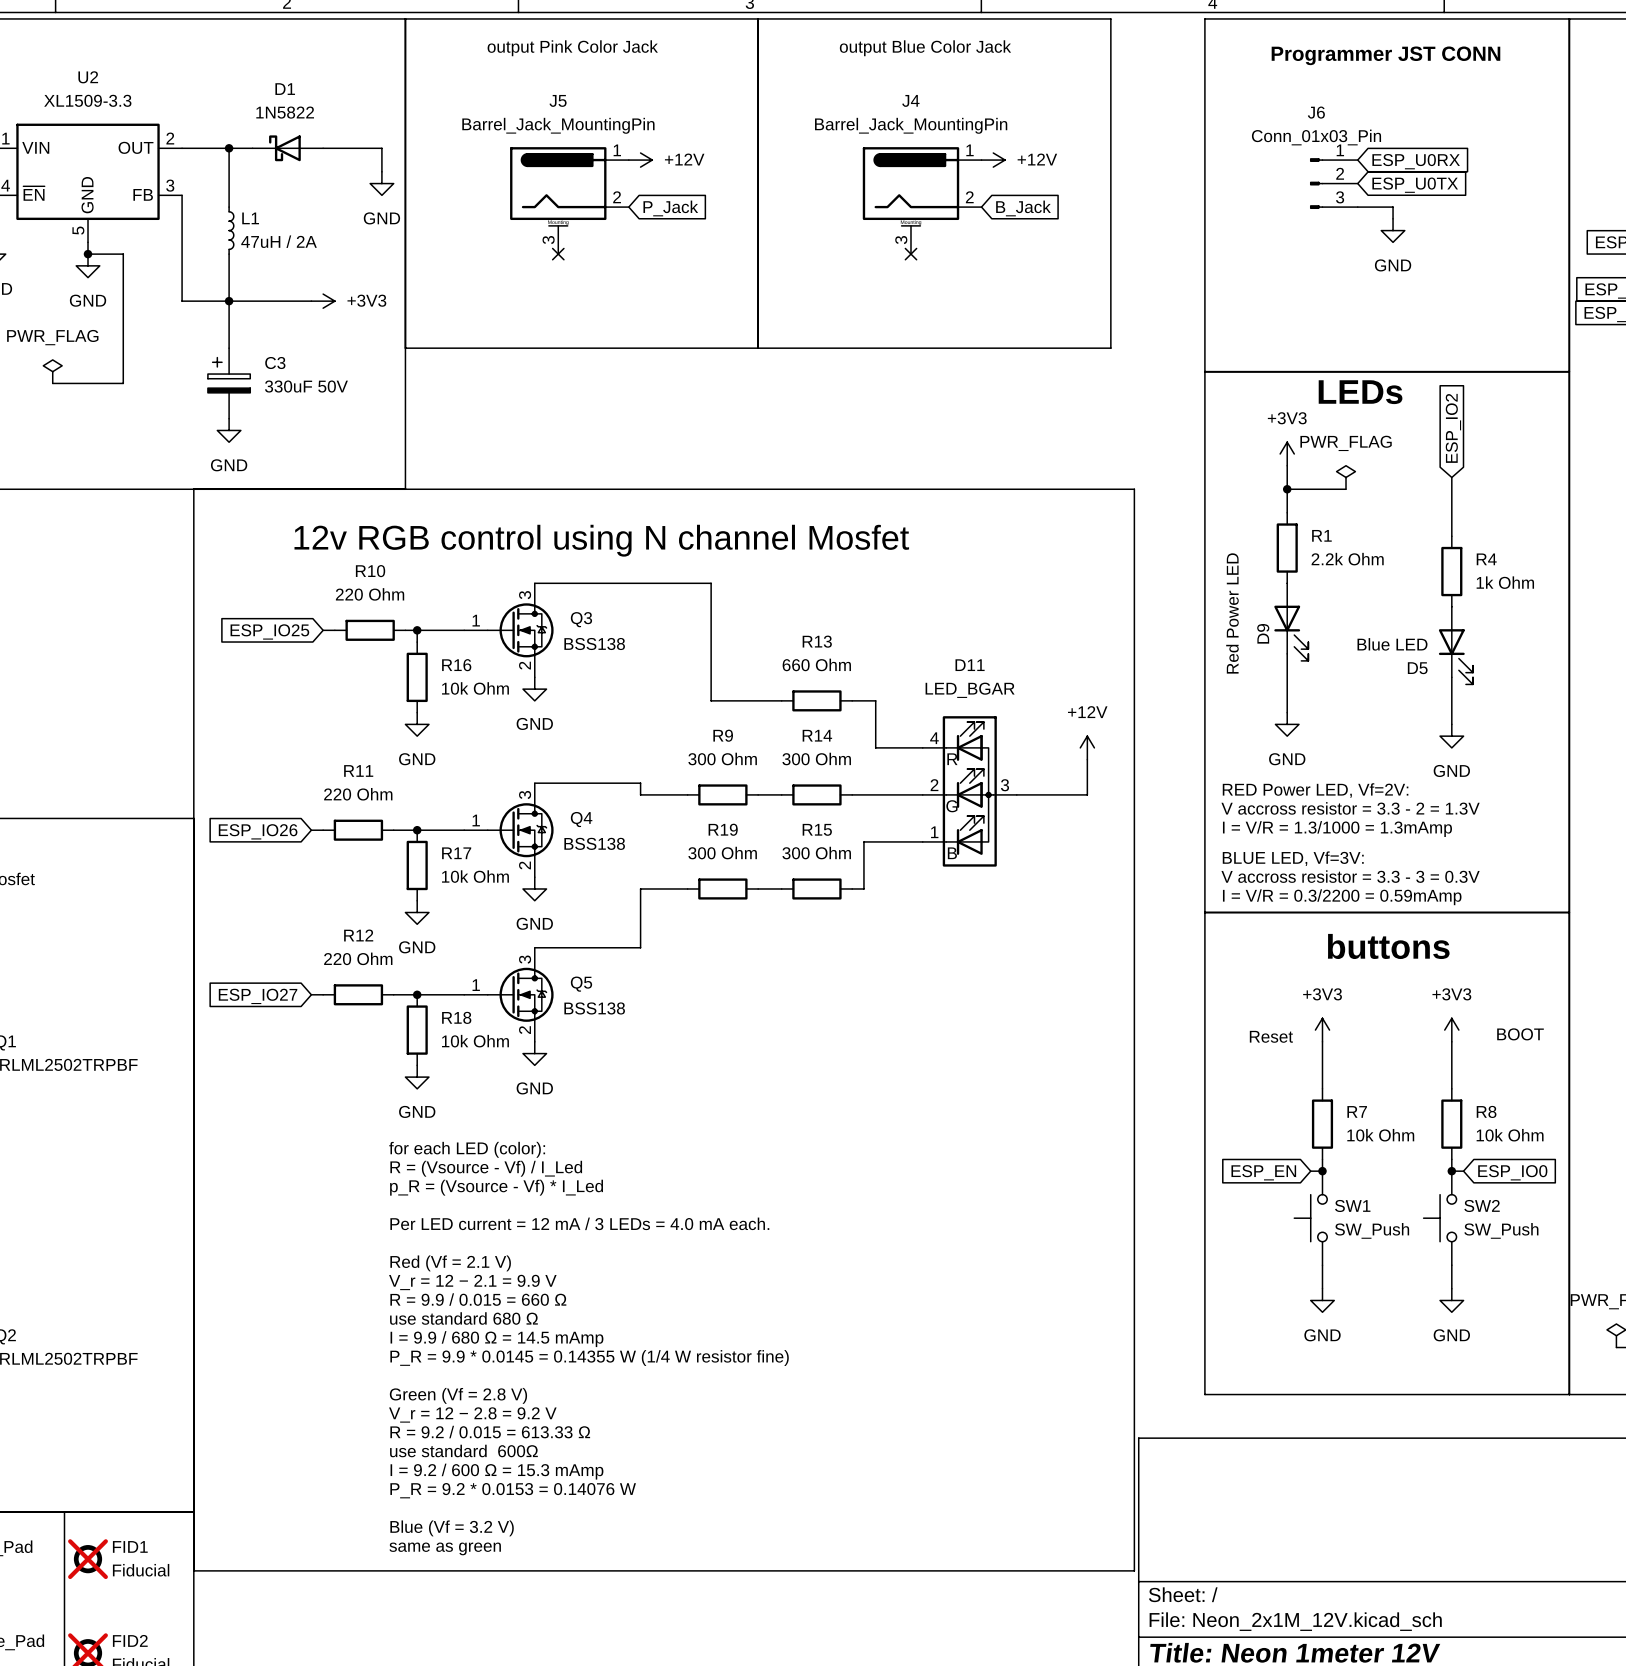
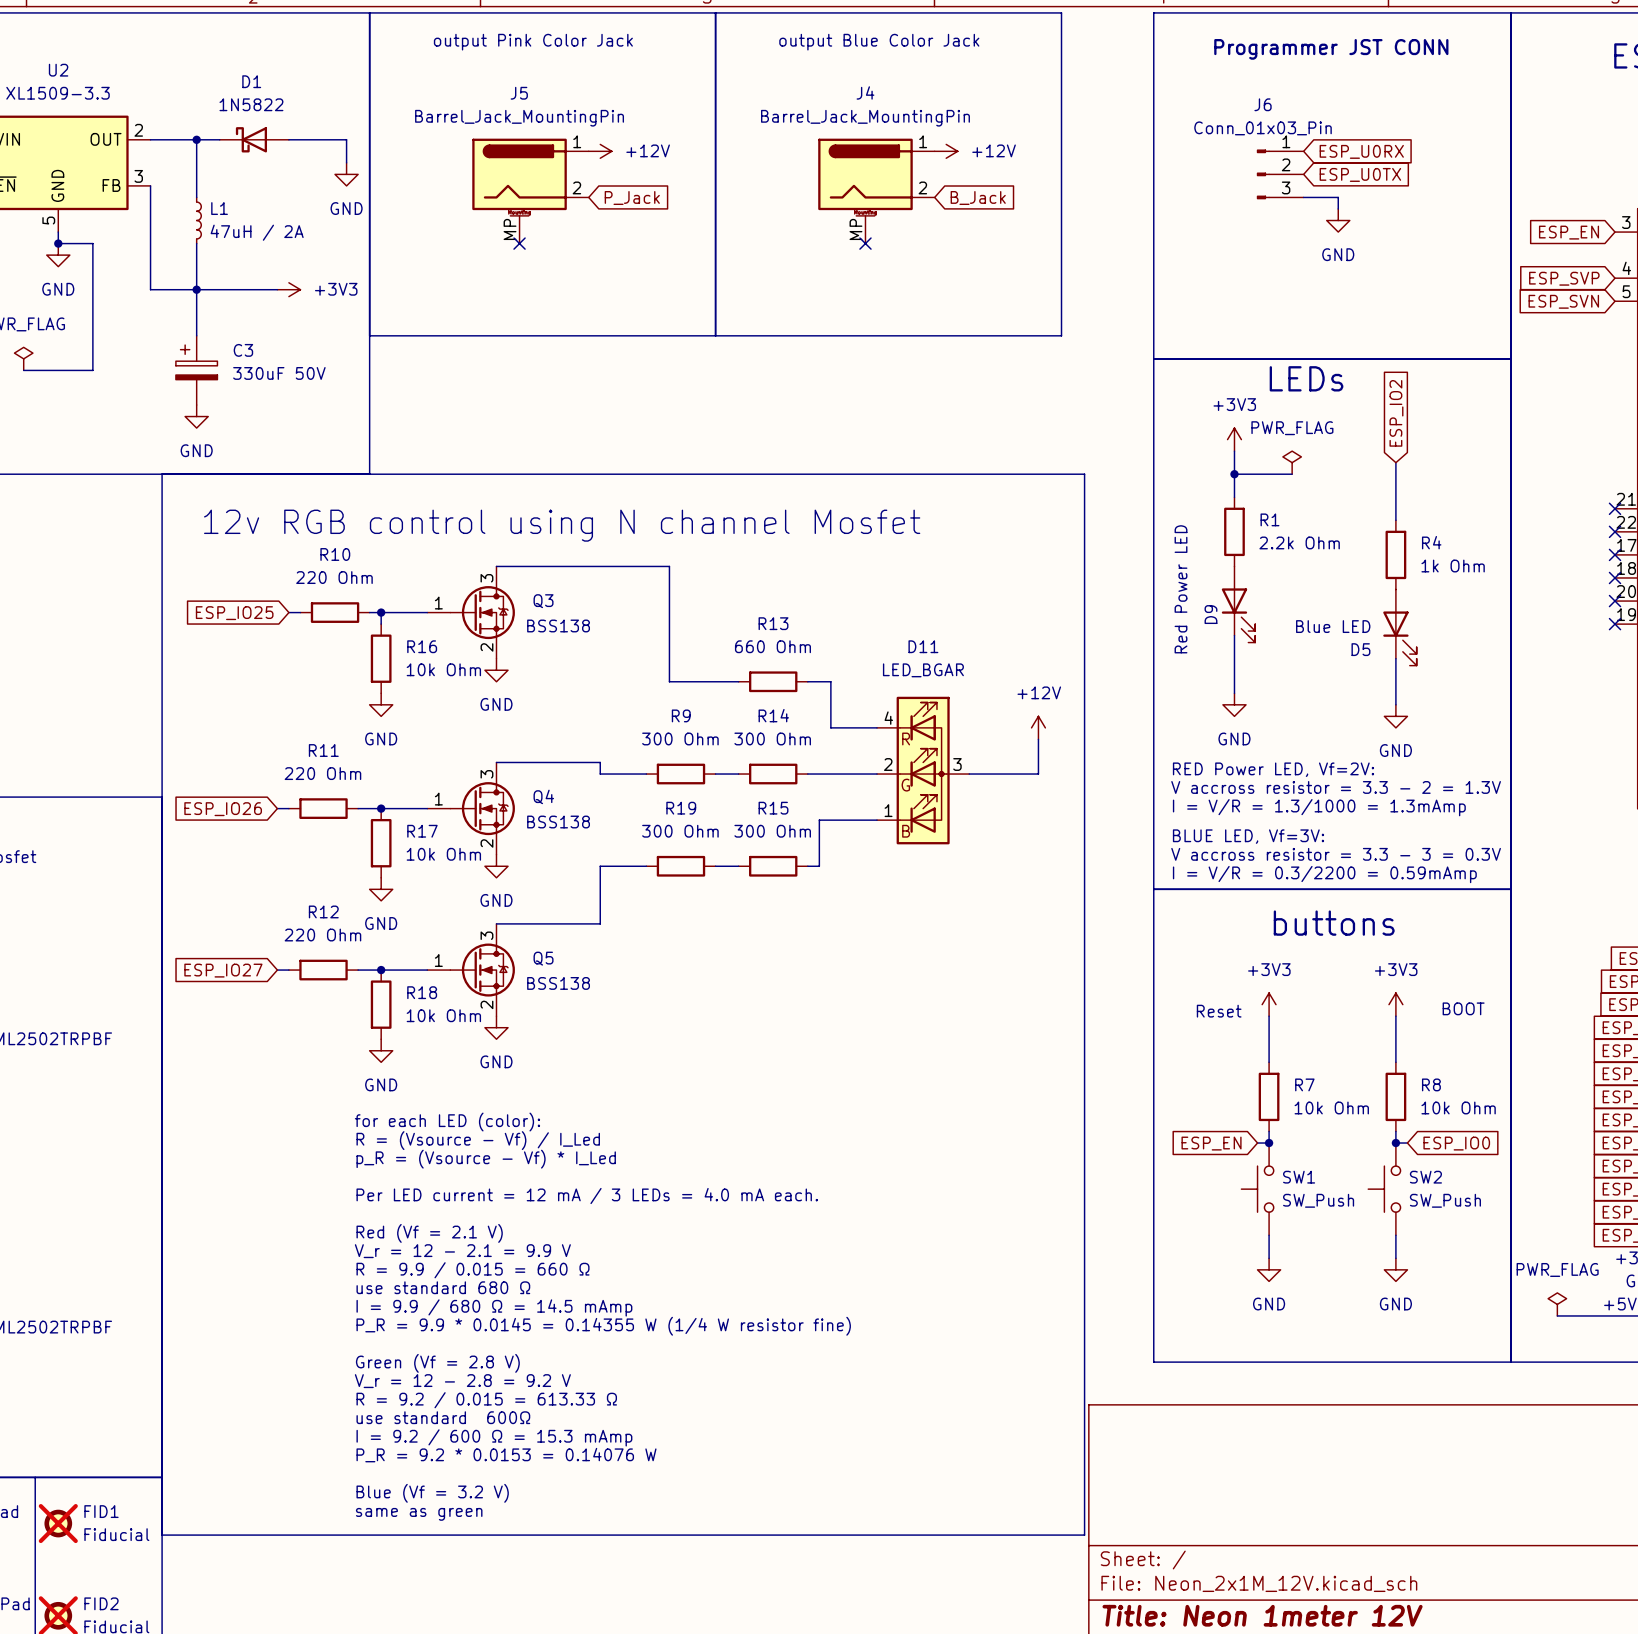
J5 pin number: 3 (548, 240) -> MP (510, 229)
J4 pin number: 3 (901, 240) -> MP (855, 229)

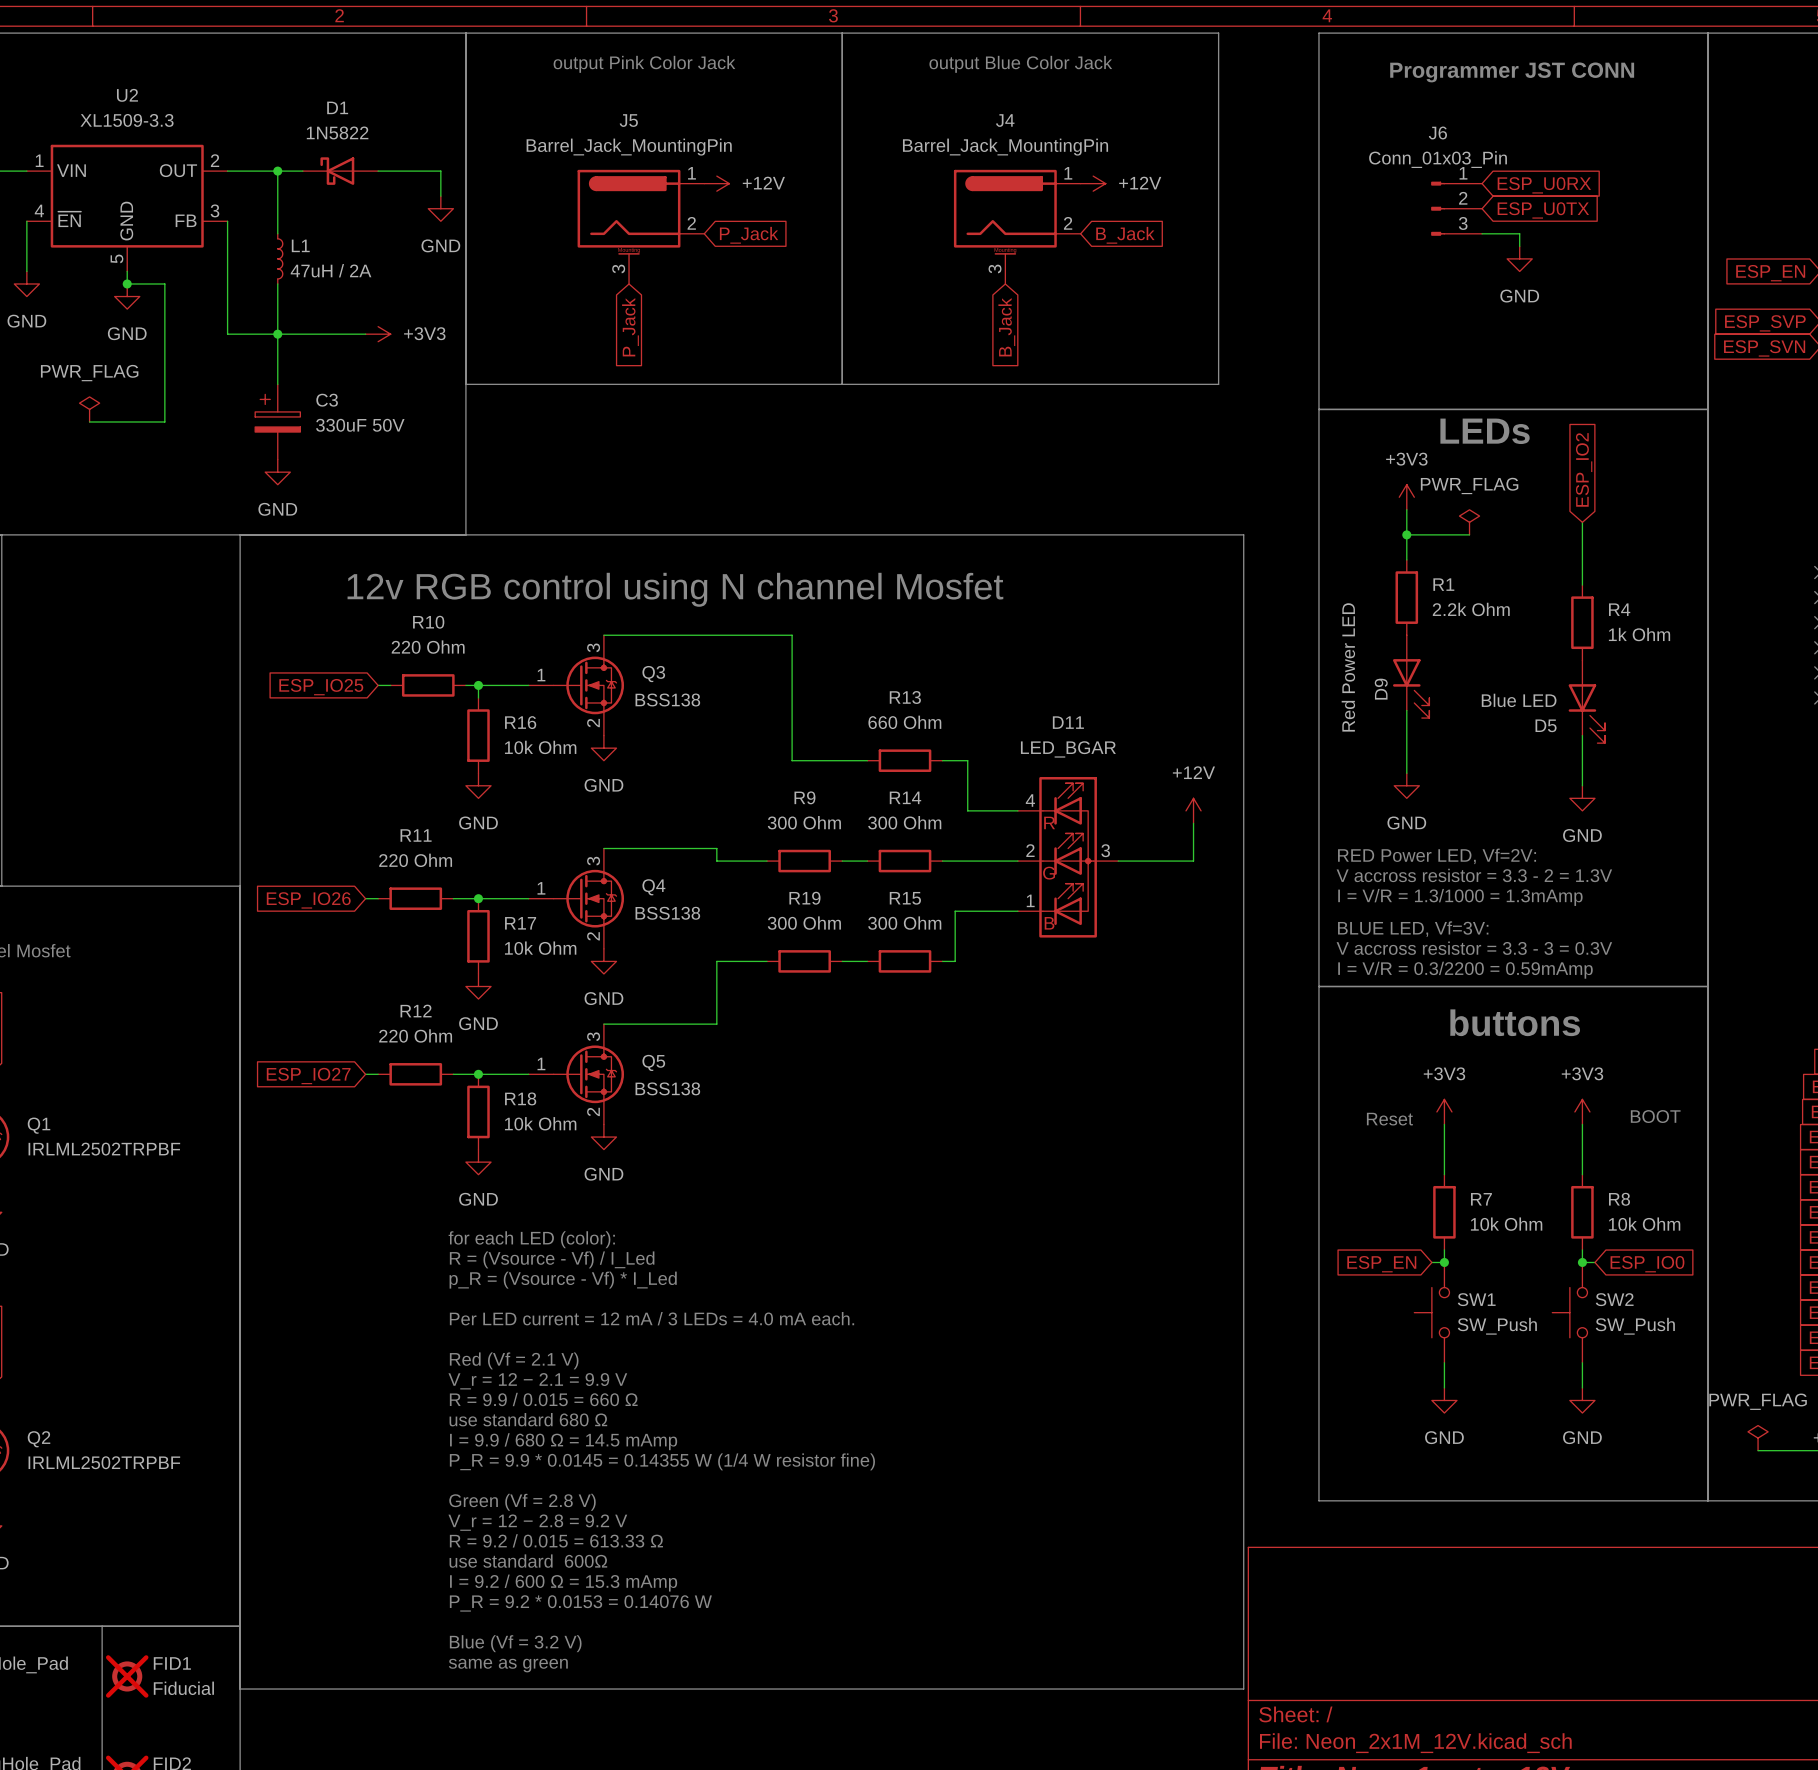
J5 pin number: MP (510, 229) -> 3 (618, 268)
J4 pin number: MP (855, 229) -> 3 (995, 268)
no-connect mark: (519, 243) -> none
no-connect mark: (865, 243) -> none
global label: none -> P_Jack (630, 327)
global label: none -> B_Jack (1006, 327)

